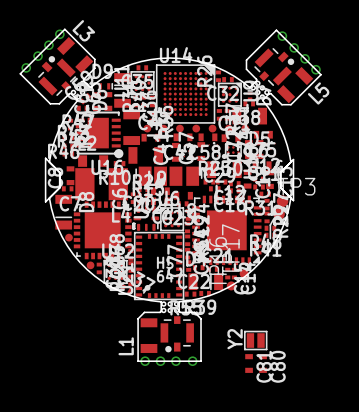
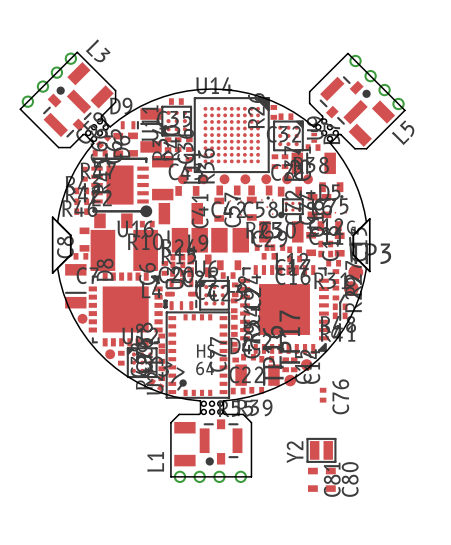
C76: none -> (323, 395)

